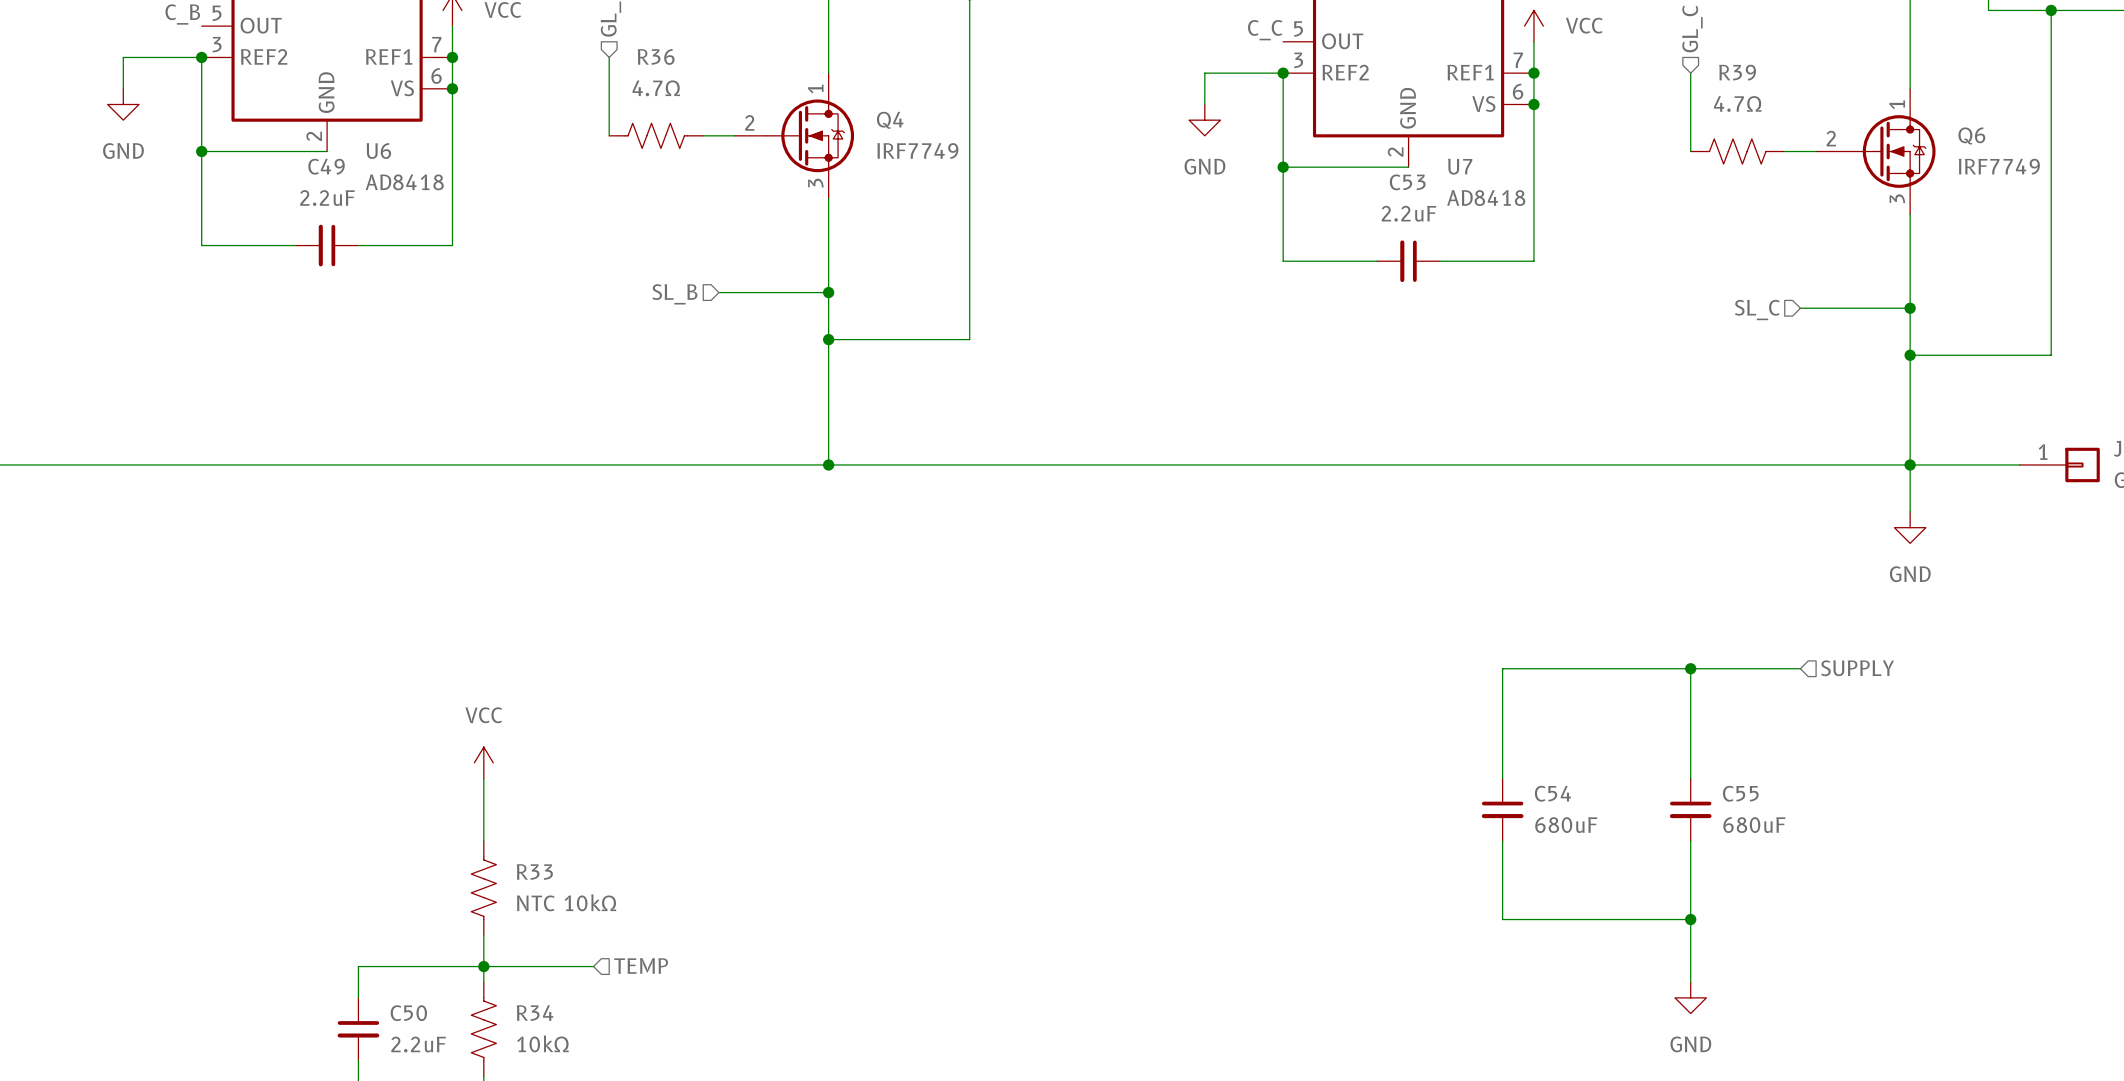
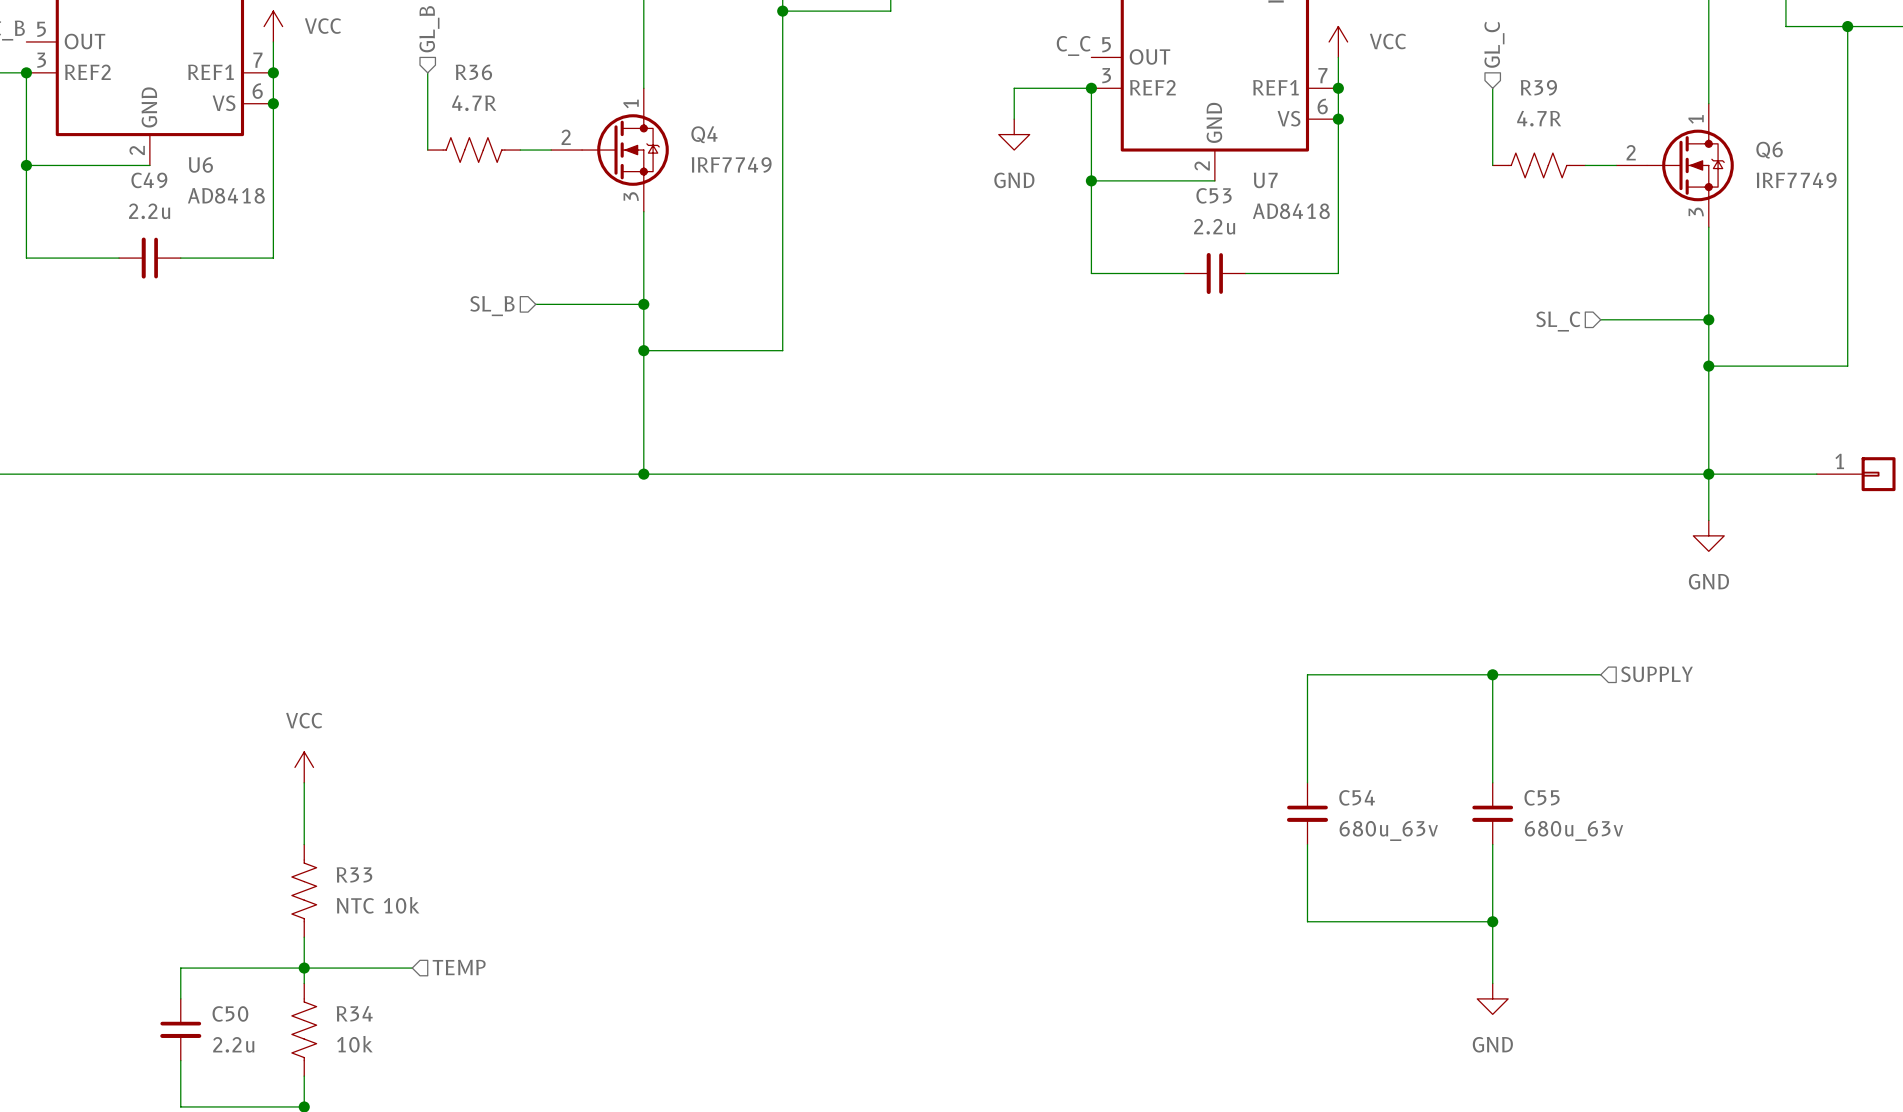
R36 value: 4.7Ω (656, 88) -> 4.7R (474, 103)
R39 value: 4.7Ω (1737, 103) -> 4.7R (1539, 118)
C49 value: 2.2uF (327, 198) -> 2.2u (149, 211)
C53 value: 2.2uF (1408, 213) -> 2.2u (1214, 226)
C54 value: 680uF (1566, 825) -> 680u_63v (1388, 830)
C55 value: 680uF (1754, 825) -> 680u_63v (1573, 830)
R33 value: NTC 10kΩ (566, 902) -> NTC 10k (378, 905)
R34 value: 10kΩ (542, 1043) -> 10k (354, 1044)
C50 value: 2.2uF (418, 1044) -> 2.2u (233, 1044)

